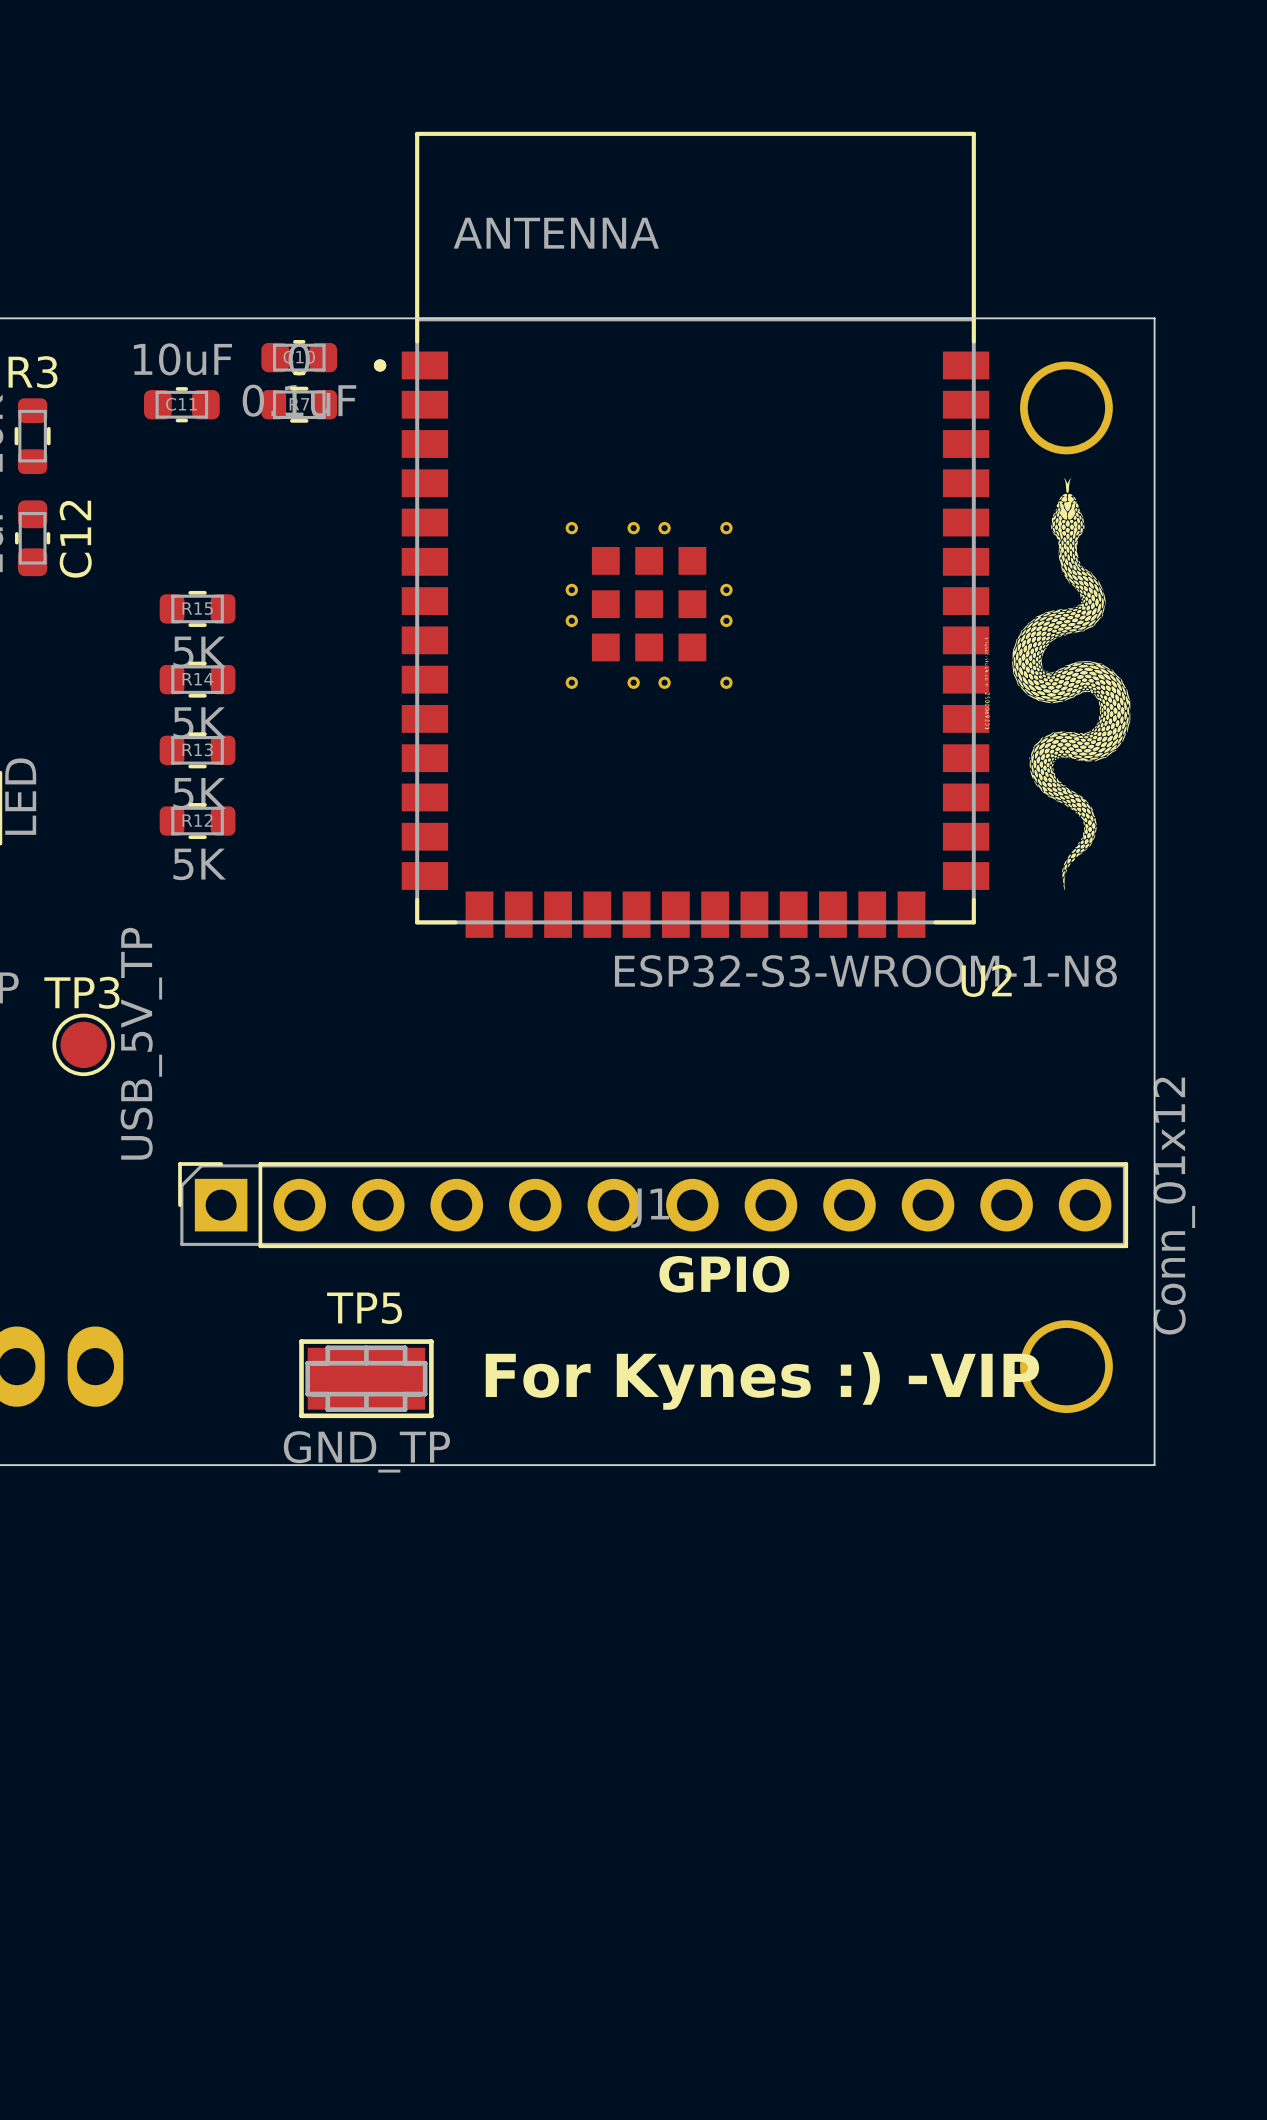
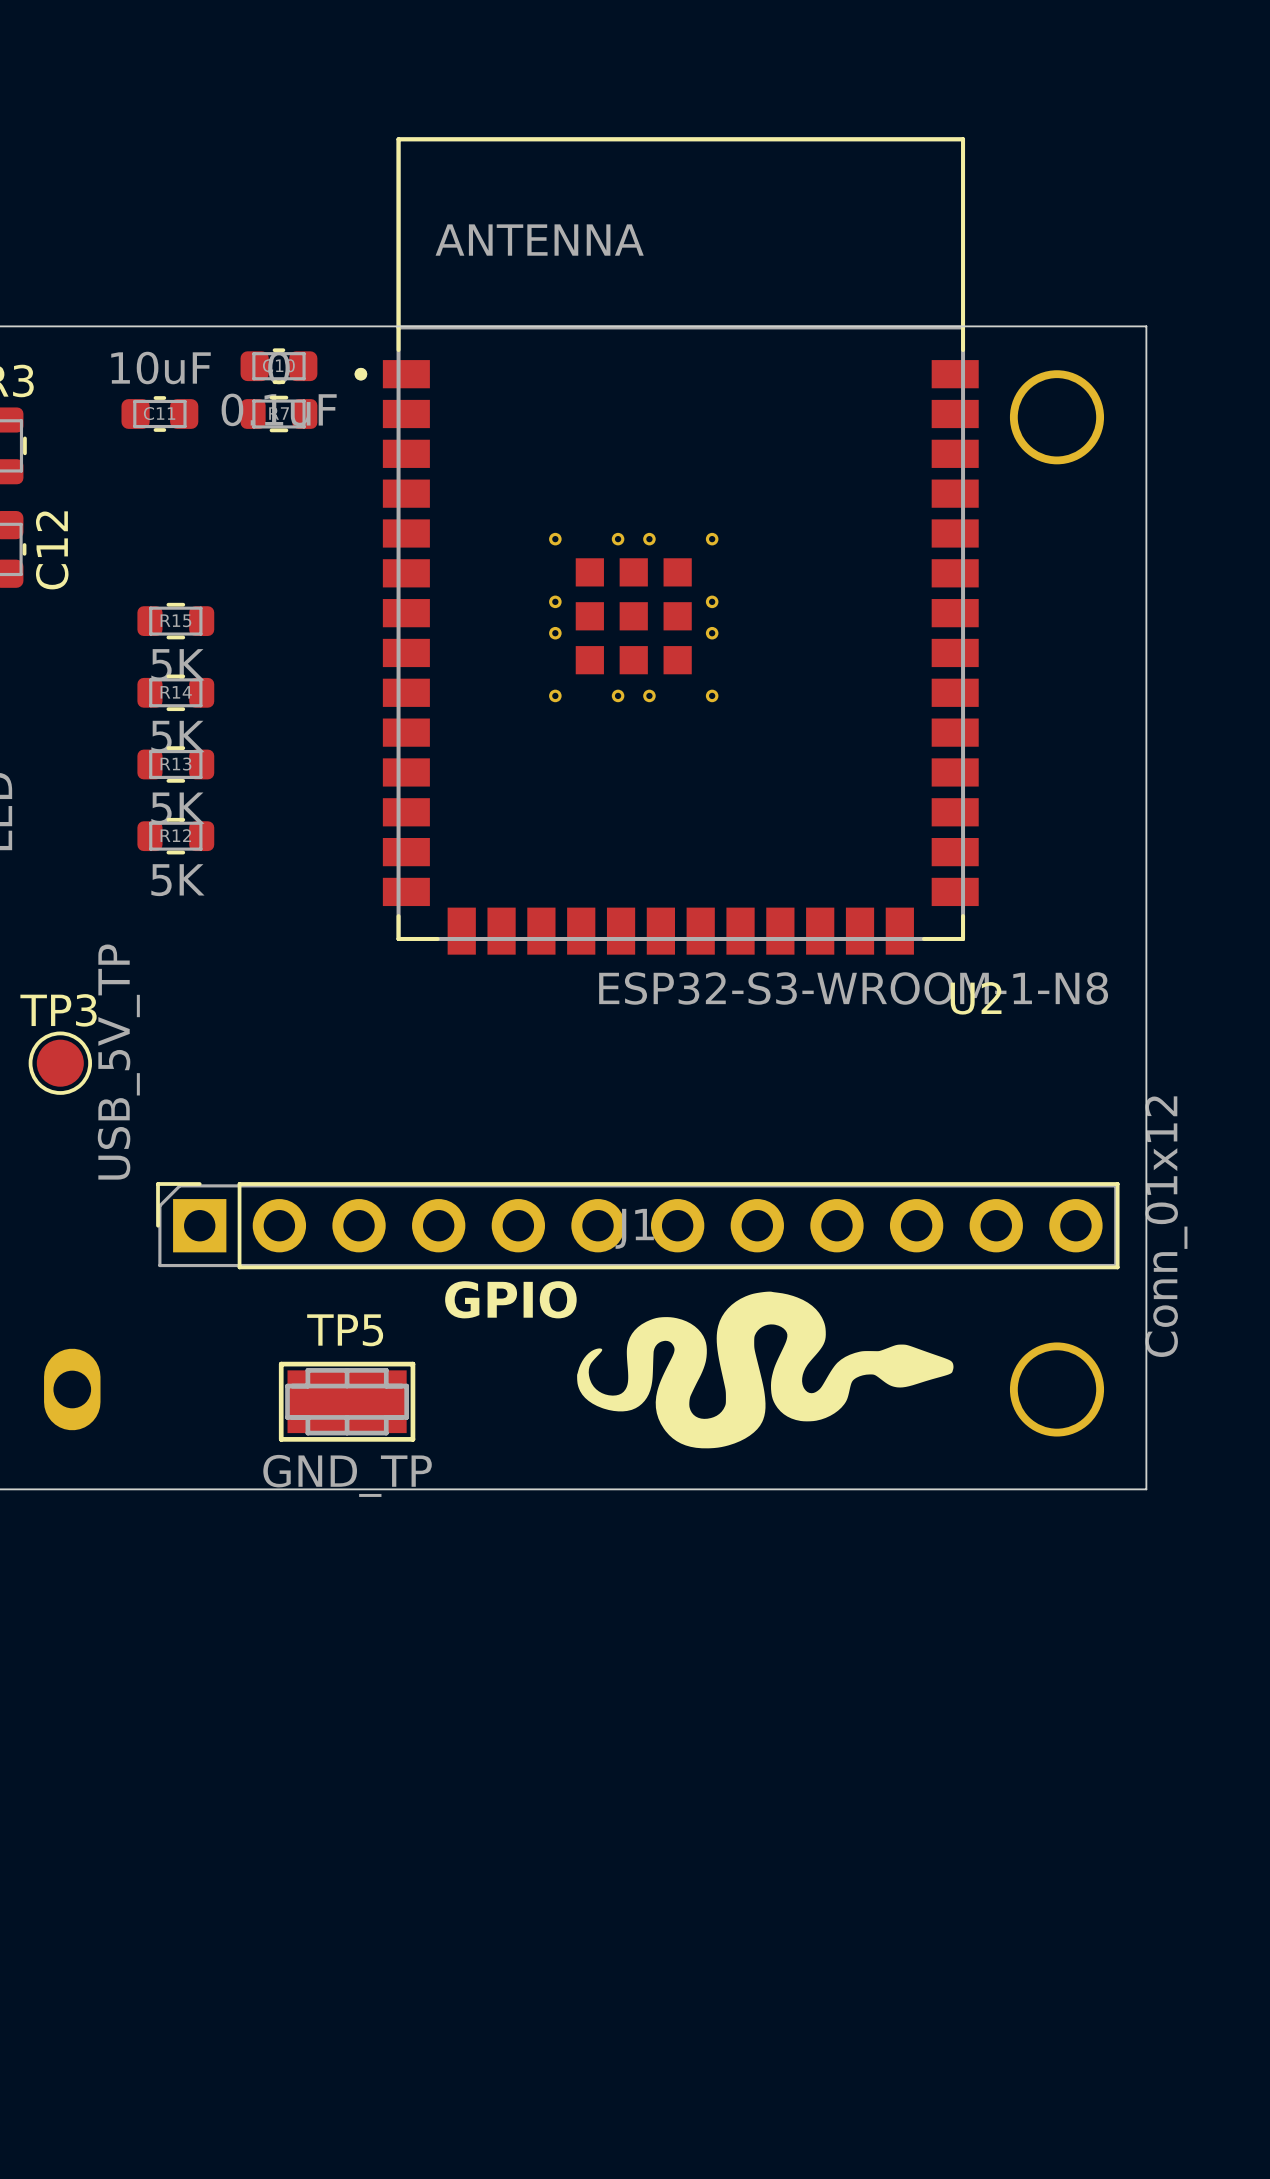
drawing: [984, 477, 1131, 891] -> none
drawing: none -> [577, 1291, 954, 1449]
text position: GPIO (724, 1274) -> GPIO (510, 1299)
text: For Kynes :) -VIP (762, 1380) -> none

